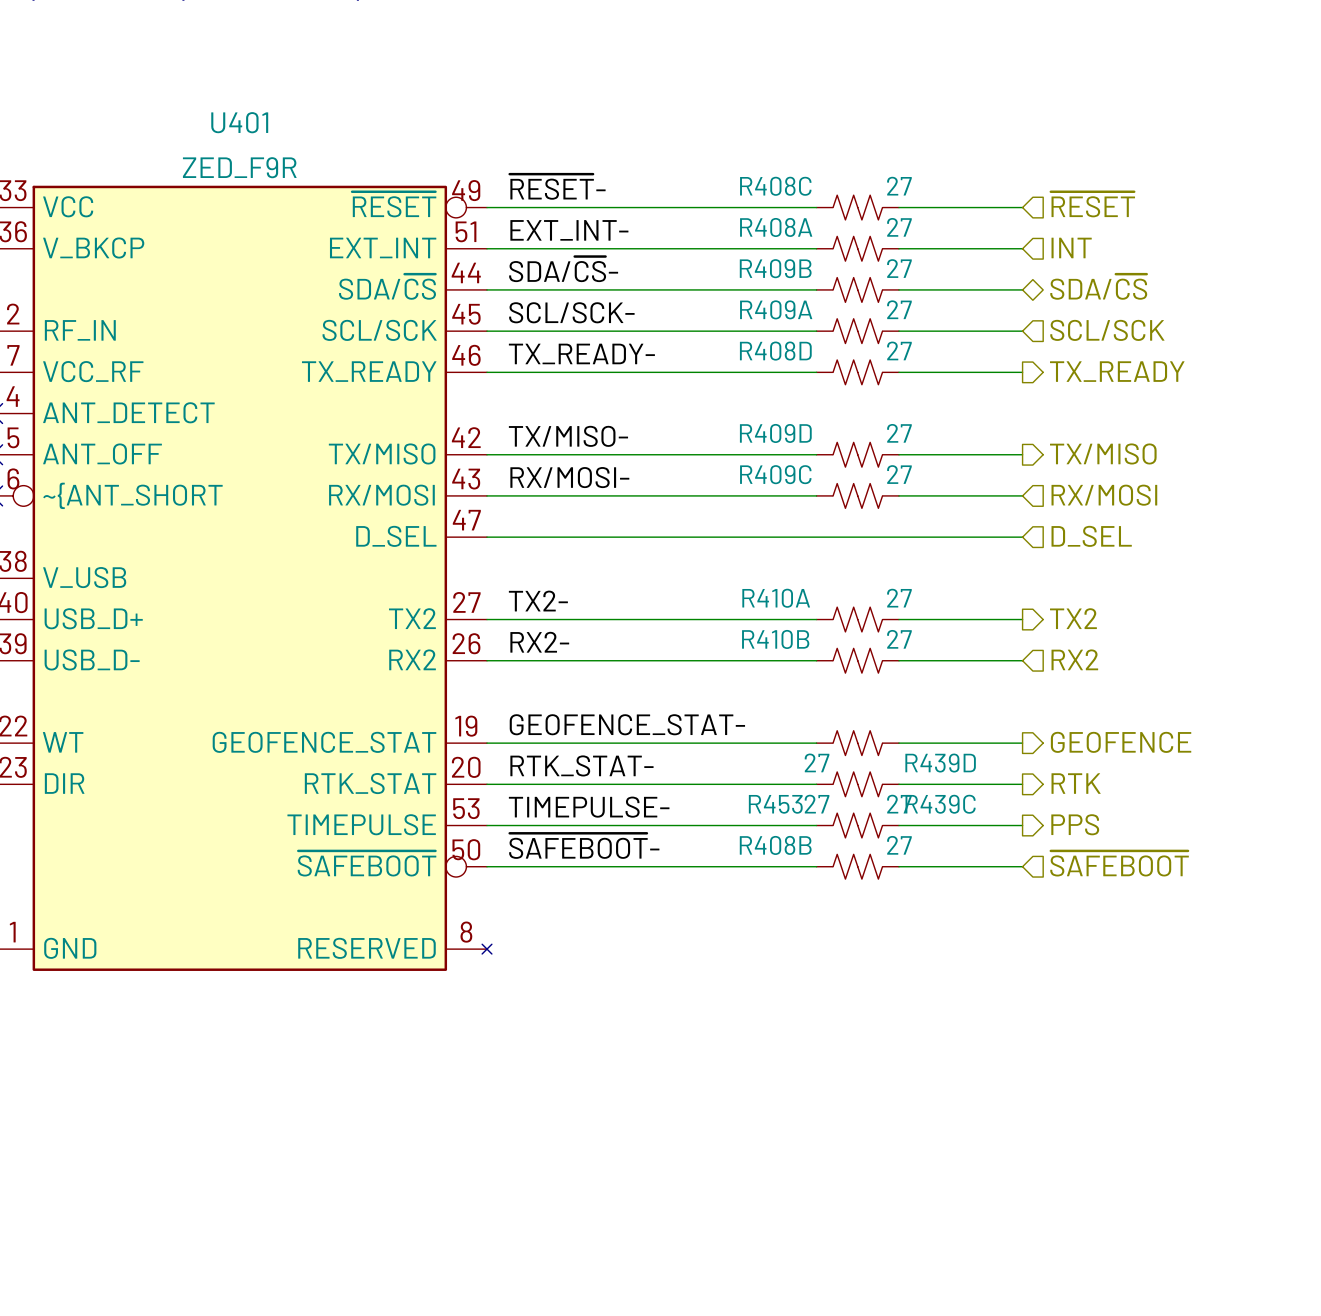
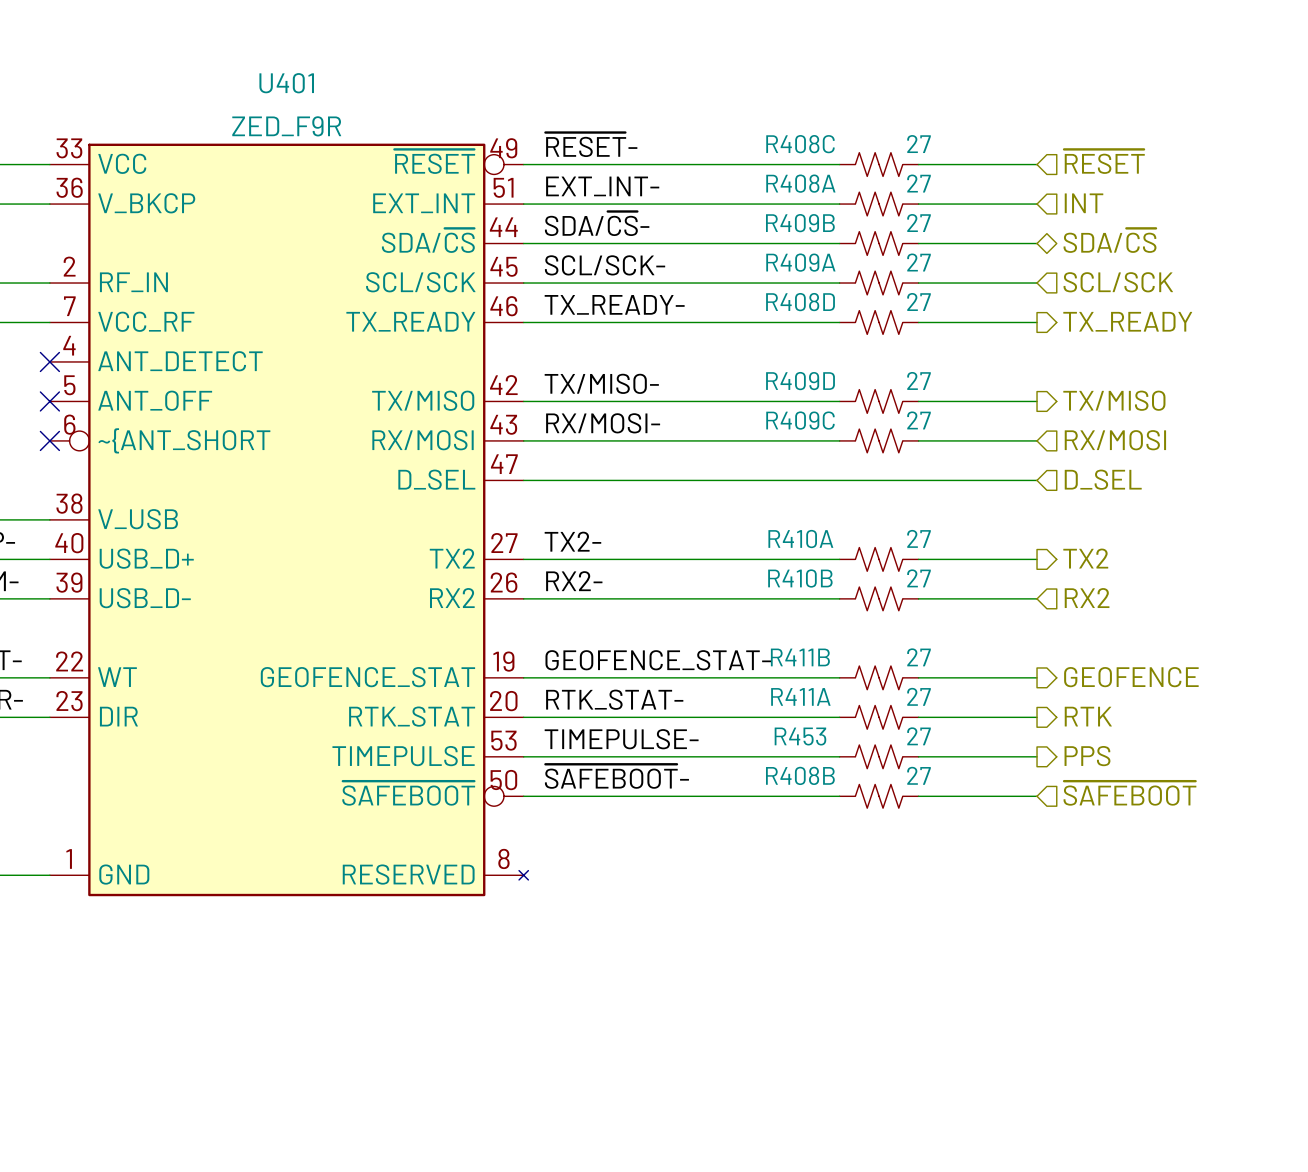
R439D value position: 27 (817, 762) -> 27 (919, 657)
R439D name: R439D (940, 763) -> R411B (800, 657)
R439C value position: 27 (817, 804) -> 27 (919, 696)
R439C name: R439C (940, 804) -> R411A (800, 696)

